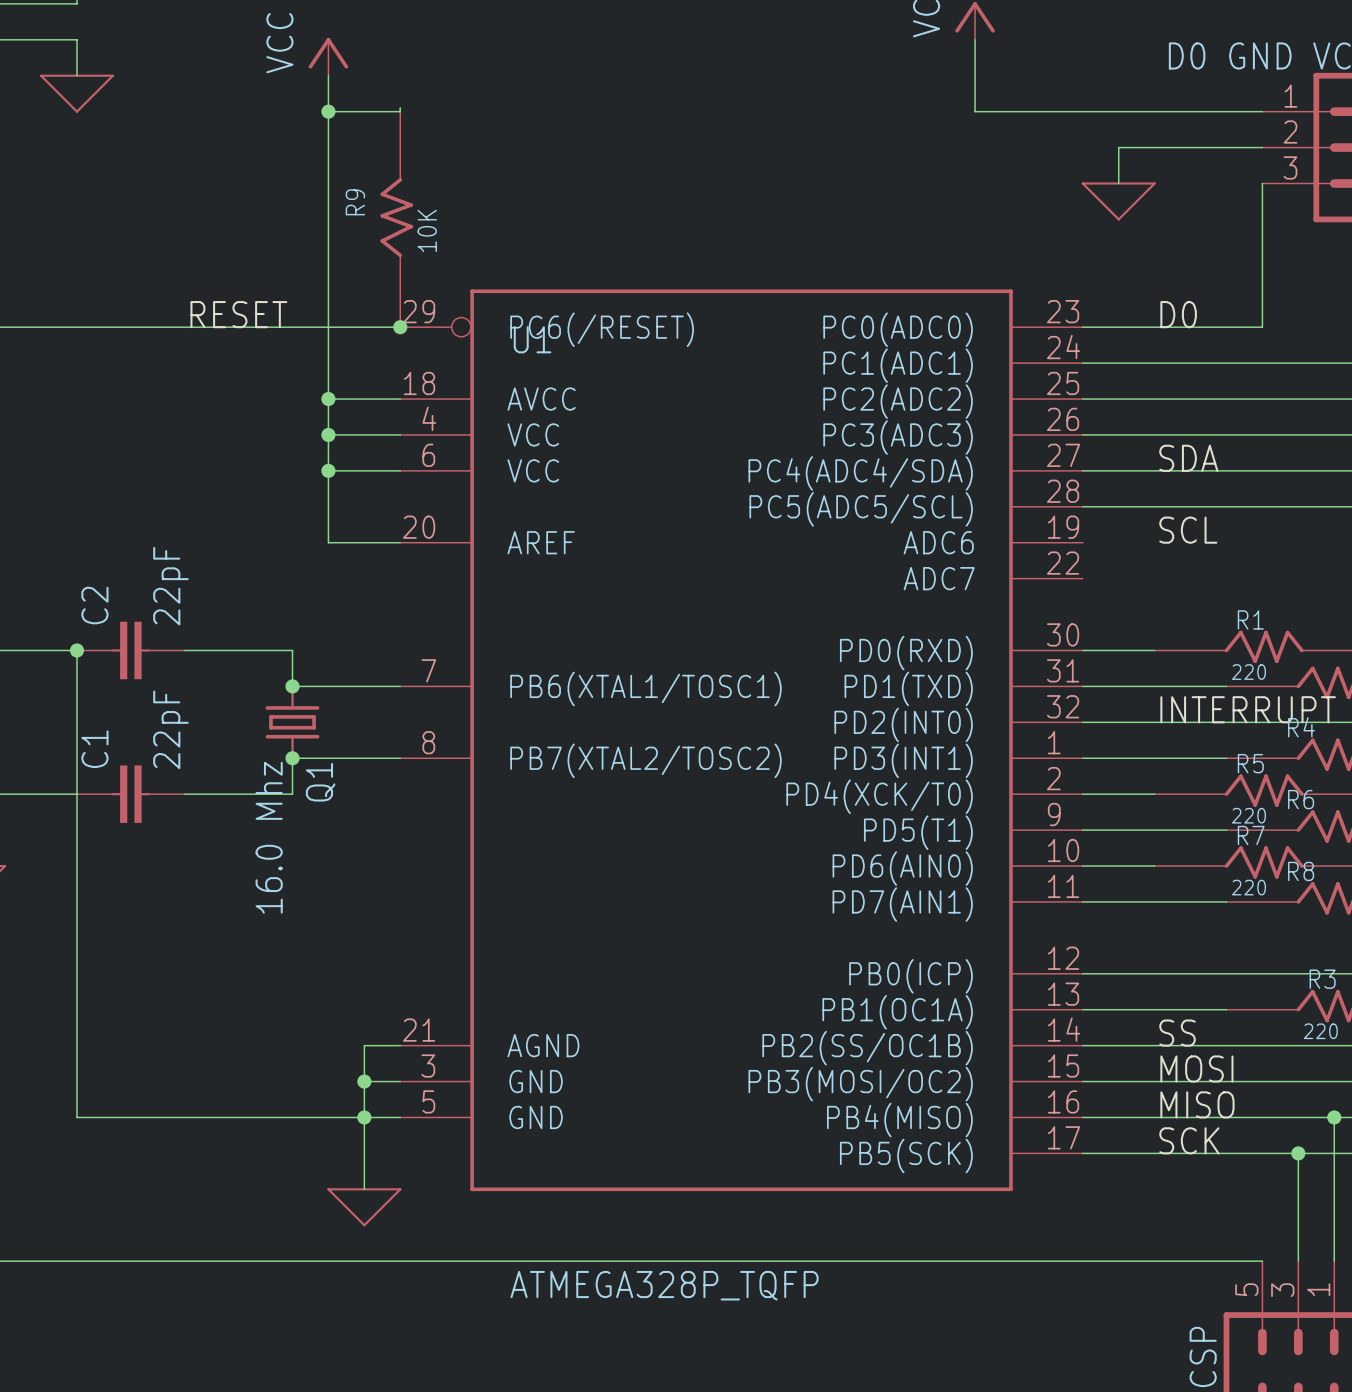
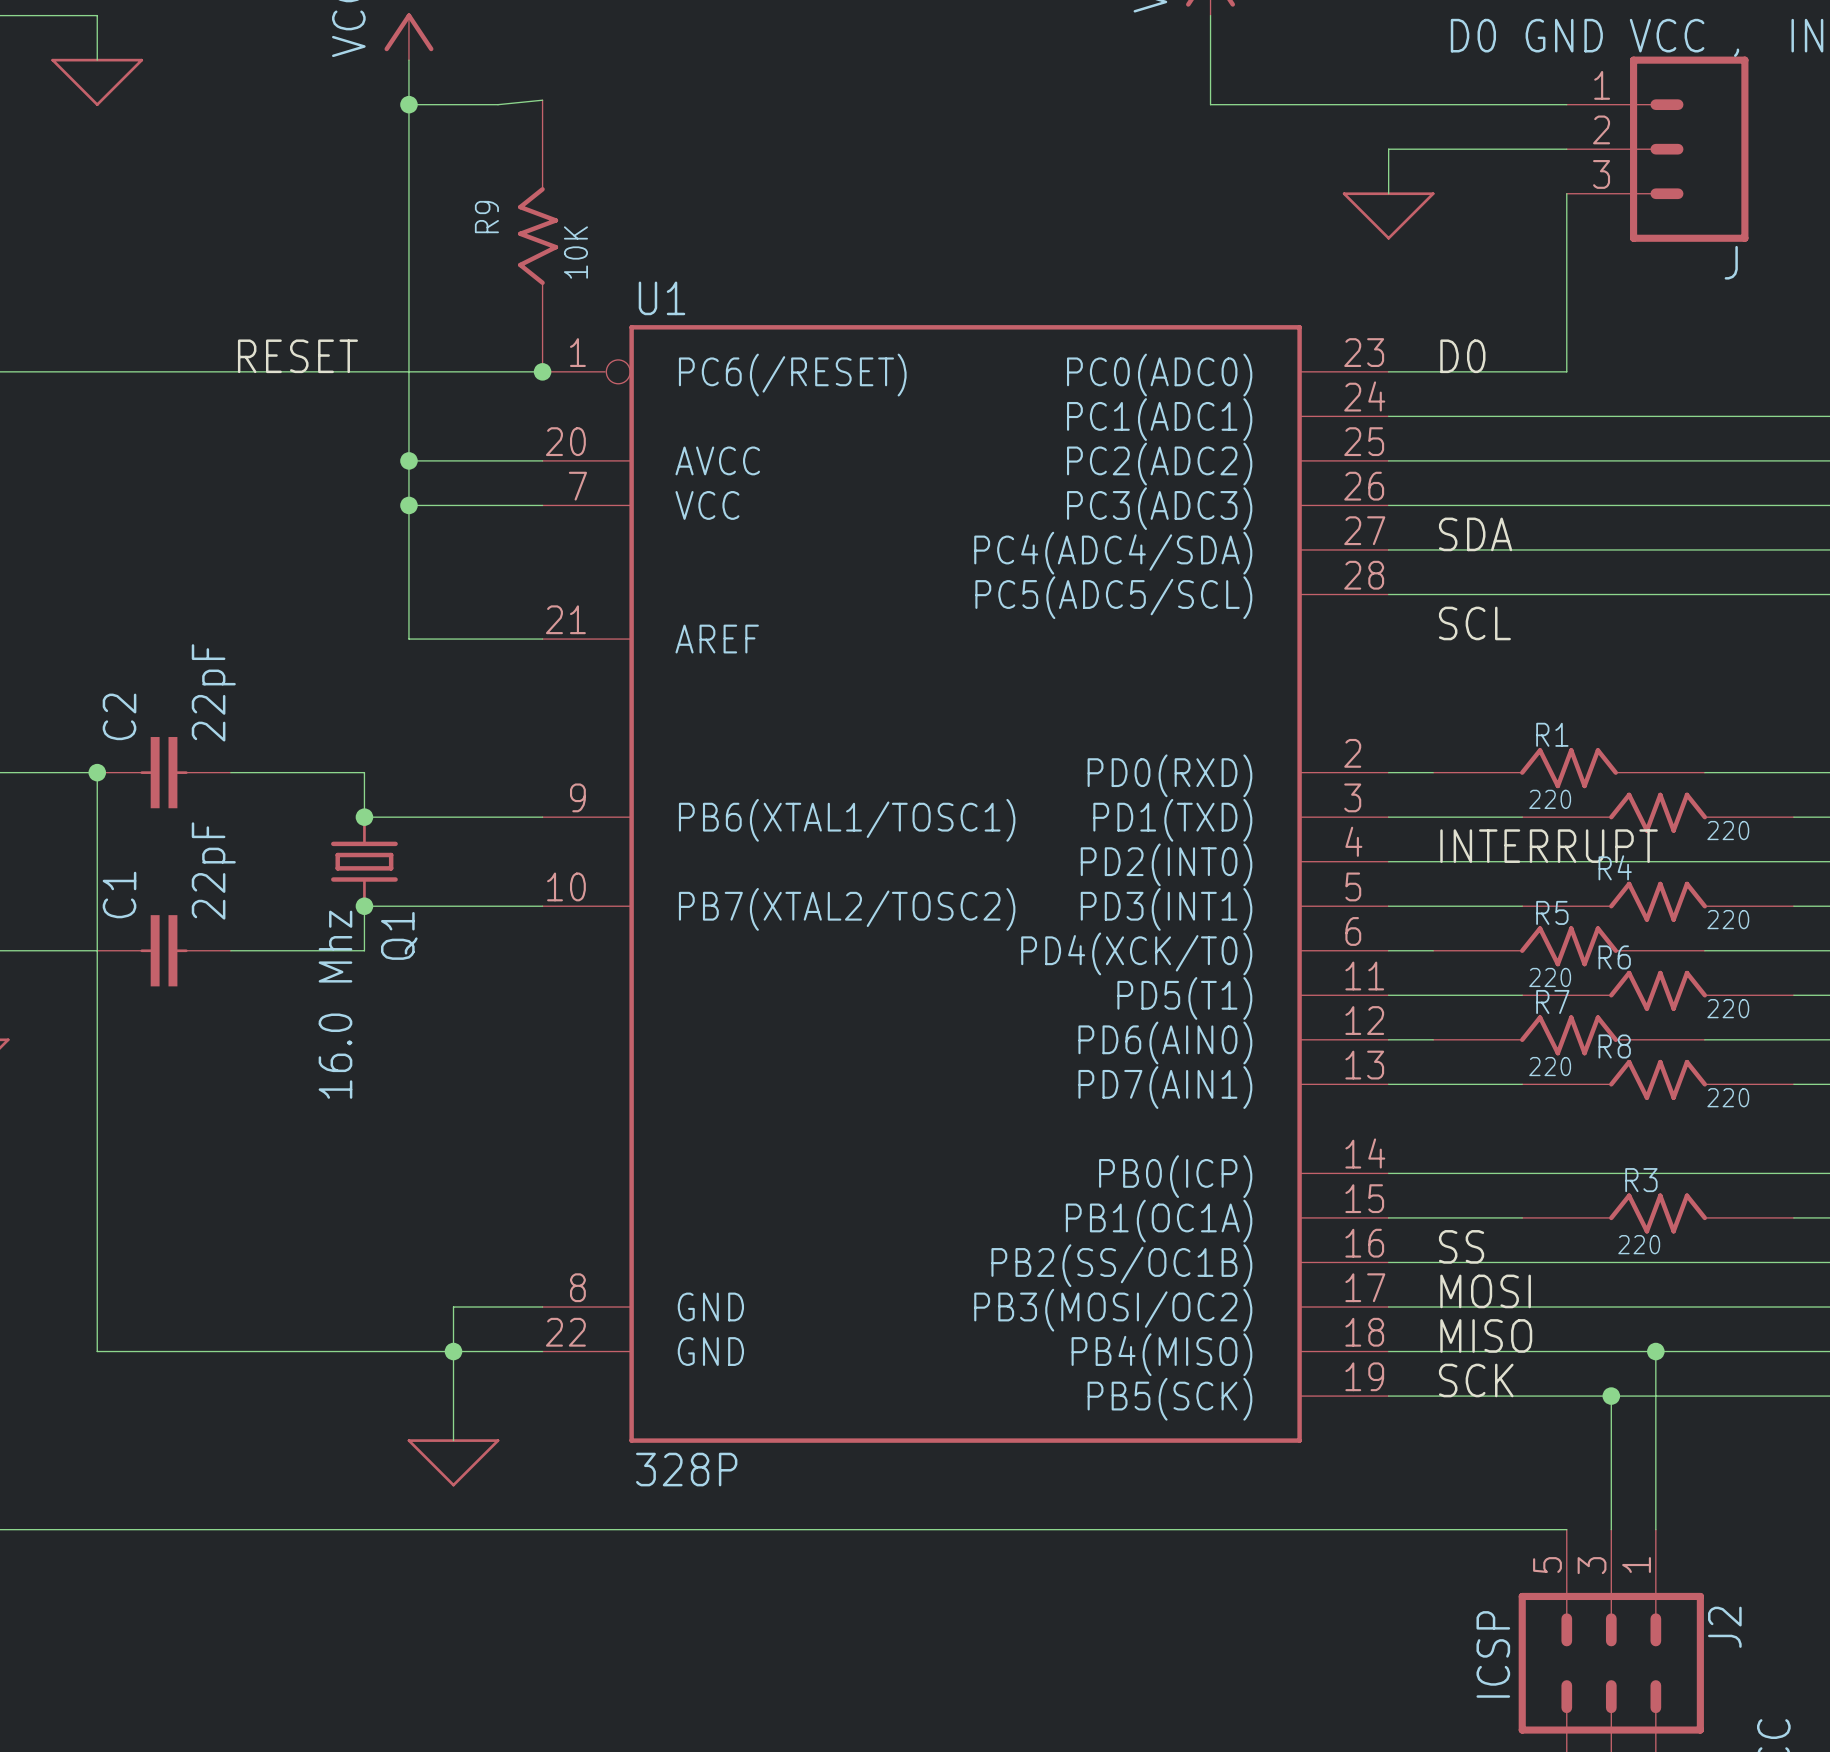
wire: (400, 108) (400, 111) -> (542, 100) (498, 104)
R9 position: (396, 217) -> (538, 236)
U1 symbol: [400, 289, 1083, 1192] -> [542, 325, 1389, 1443]
junction position: (400, 327) -> (542, 371)
U1 name position: U1 (532, 339) -> U1 (661, 298)
wire: (328, 470) (400, 470) -> none
junction: (328, 470) -> none
wire: (400, 1045) (364, 1045) (364, 1081) -> none
junction: (364, 1081) -> none
U1 value: ATMEGA328P_TQFP (664, 1285) -> 328P (686, 1469)

